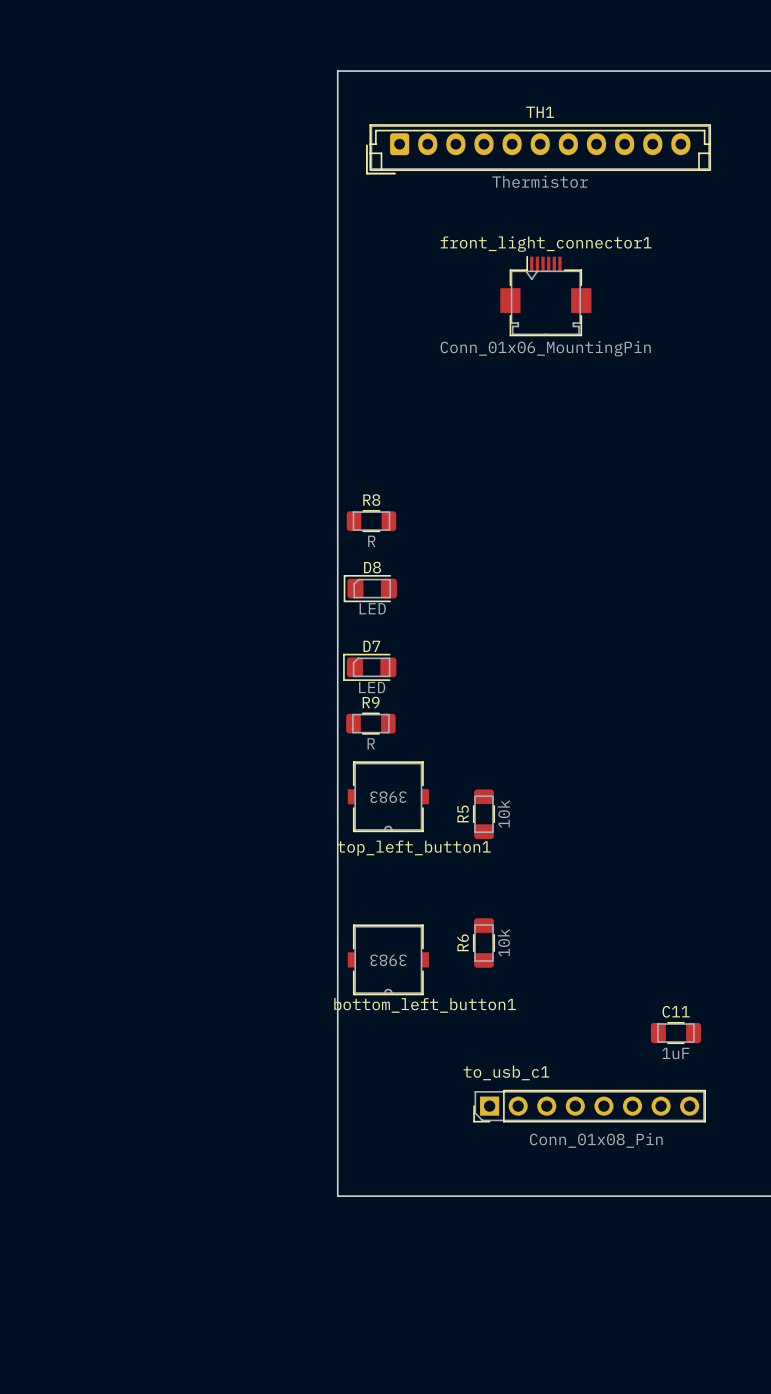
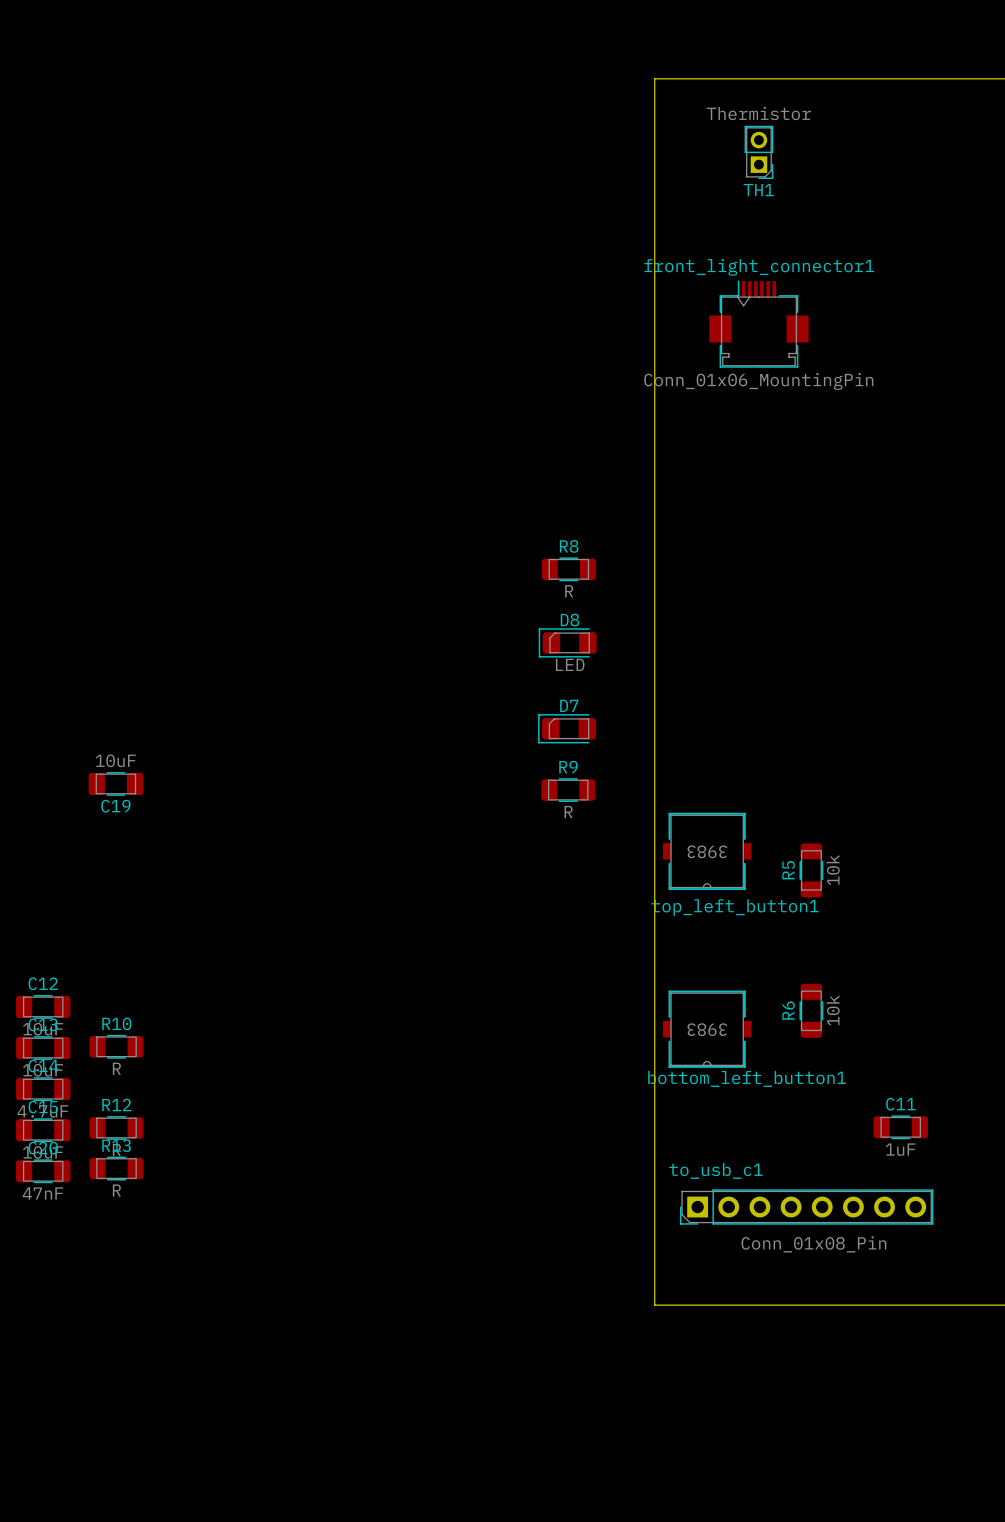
board edge: (450, 71) (337, 71) (337, 1196) (450, 1196) -> (654, 78) (654, 1305)
TH1 name position: TH1 (540, 112) -> TH1 (758, 190)
TH1 footprint: [366, 124, 711, 175] -> [744, 125, 774, 179]
TH1 value position: Thermistor (540, 181) -> Thermistor (758, 113)
D7 value: LED (372, 687) -> none
top_left_button1 position: (388, 796) -> (707, 851)
R5 position: (483, 814) -> (811, 870)
R6 position: (483, 943) -> (811, 1010)
bottom_left_button1 position: (388, 959) -> (707, 1029)

